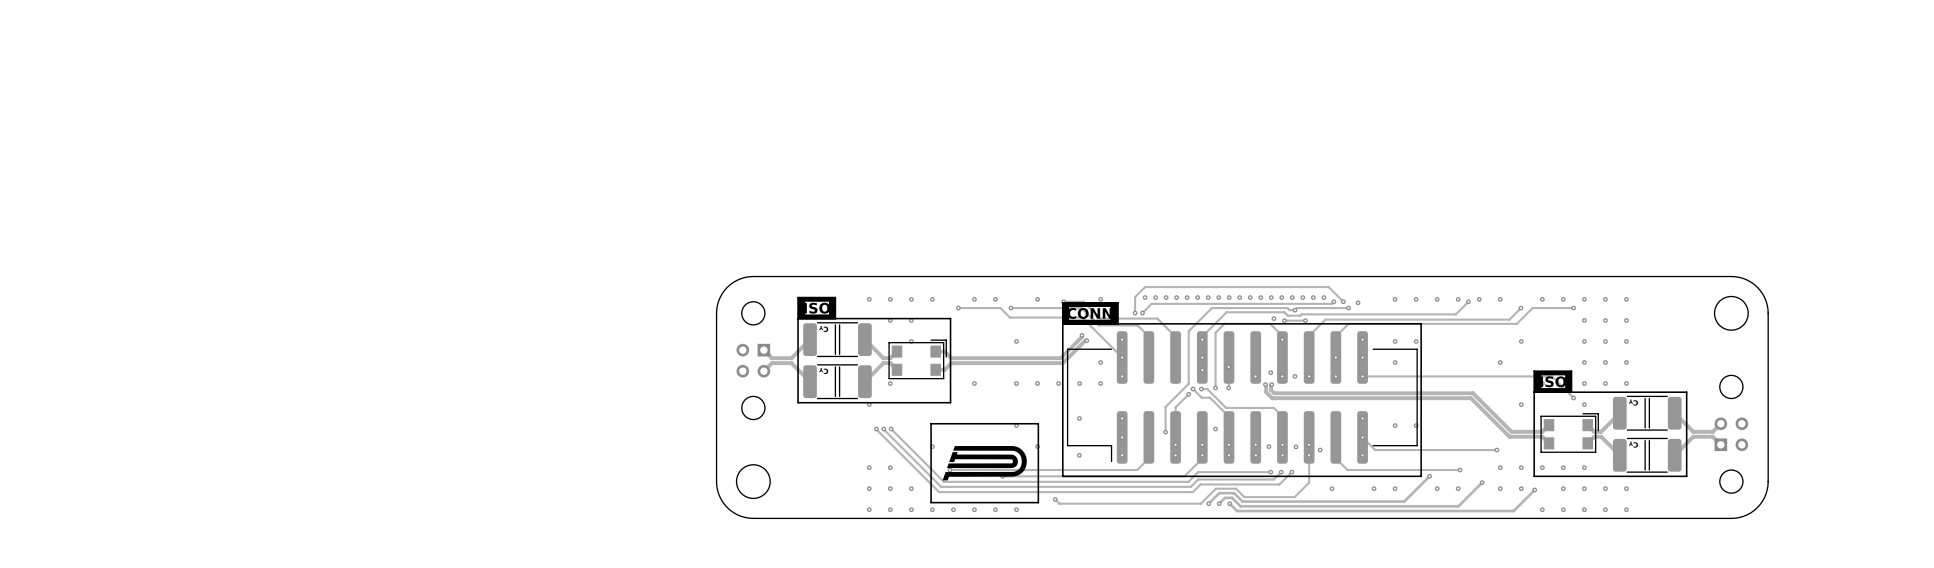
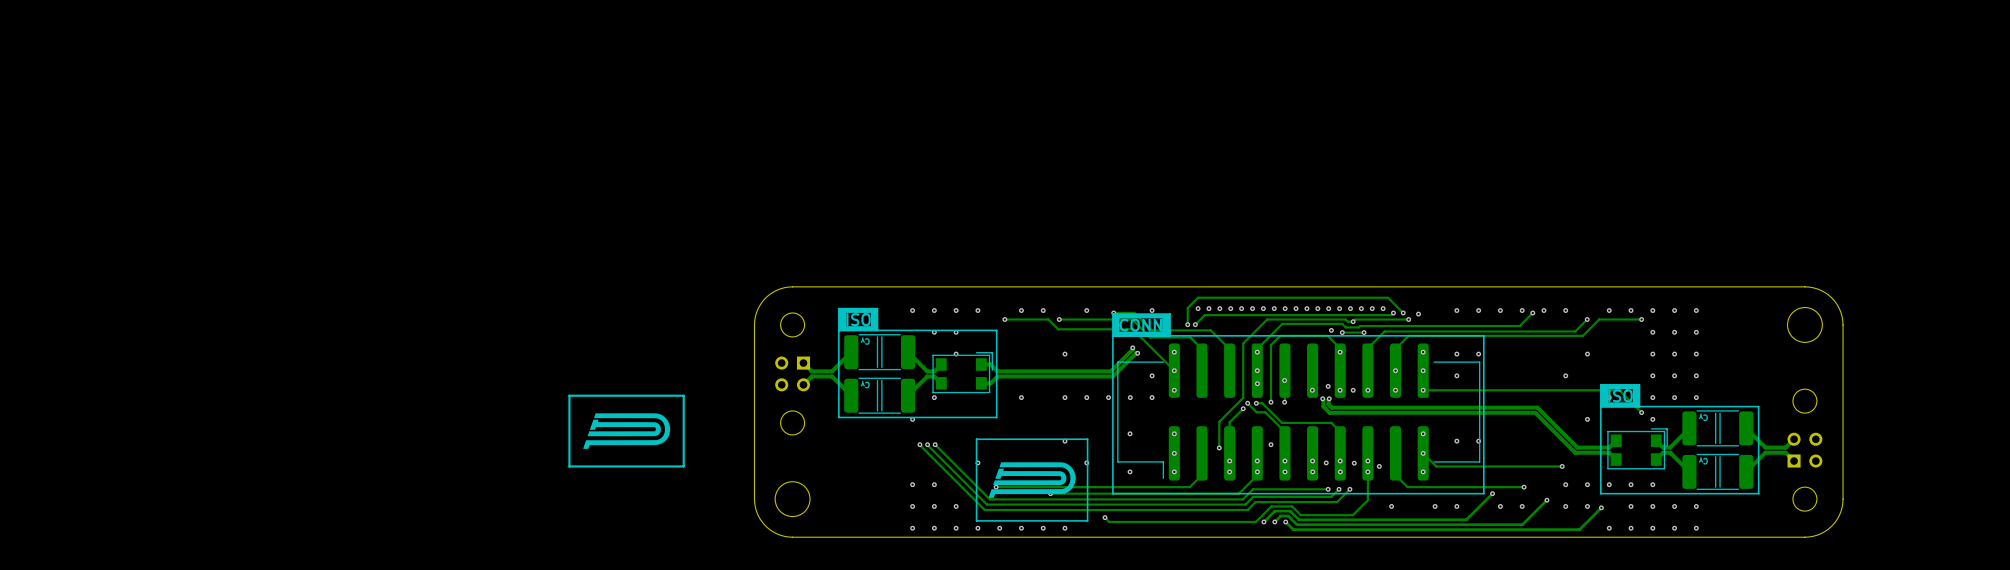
line: none -> (683, 395) (569, 395) (569, 466) (683, 466) (683, 395)
drawing: none -> [583, 413, 671, 449]

